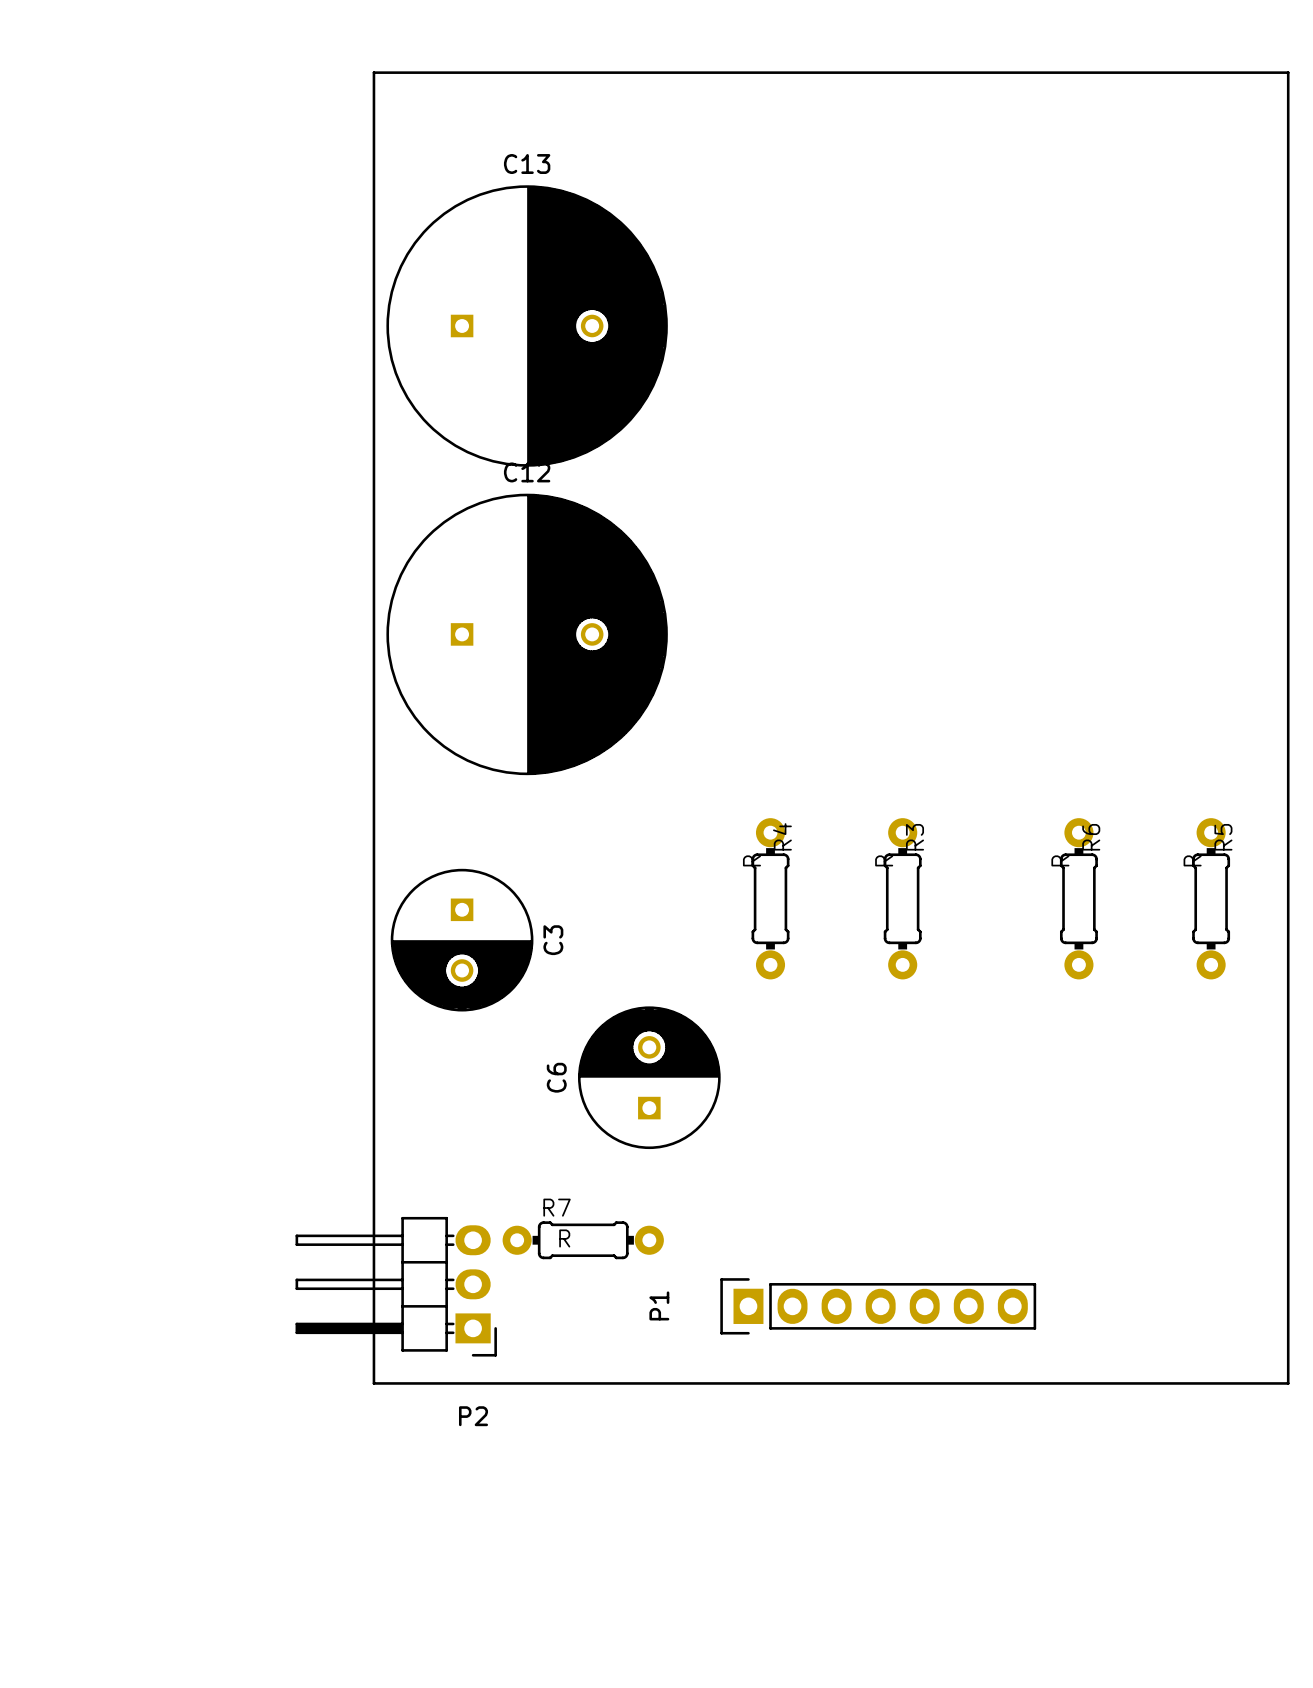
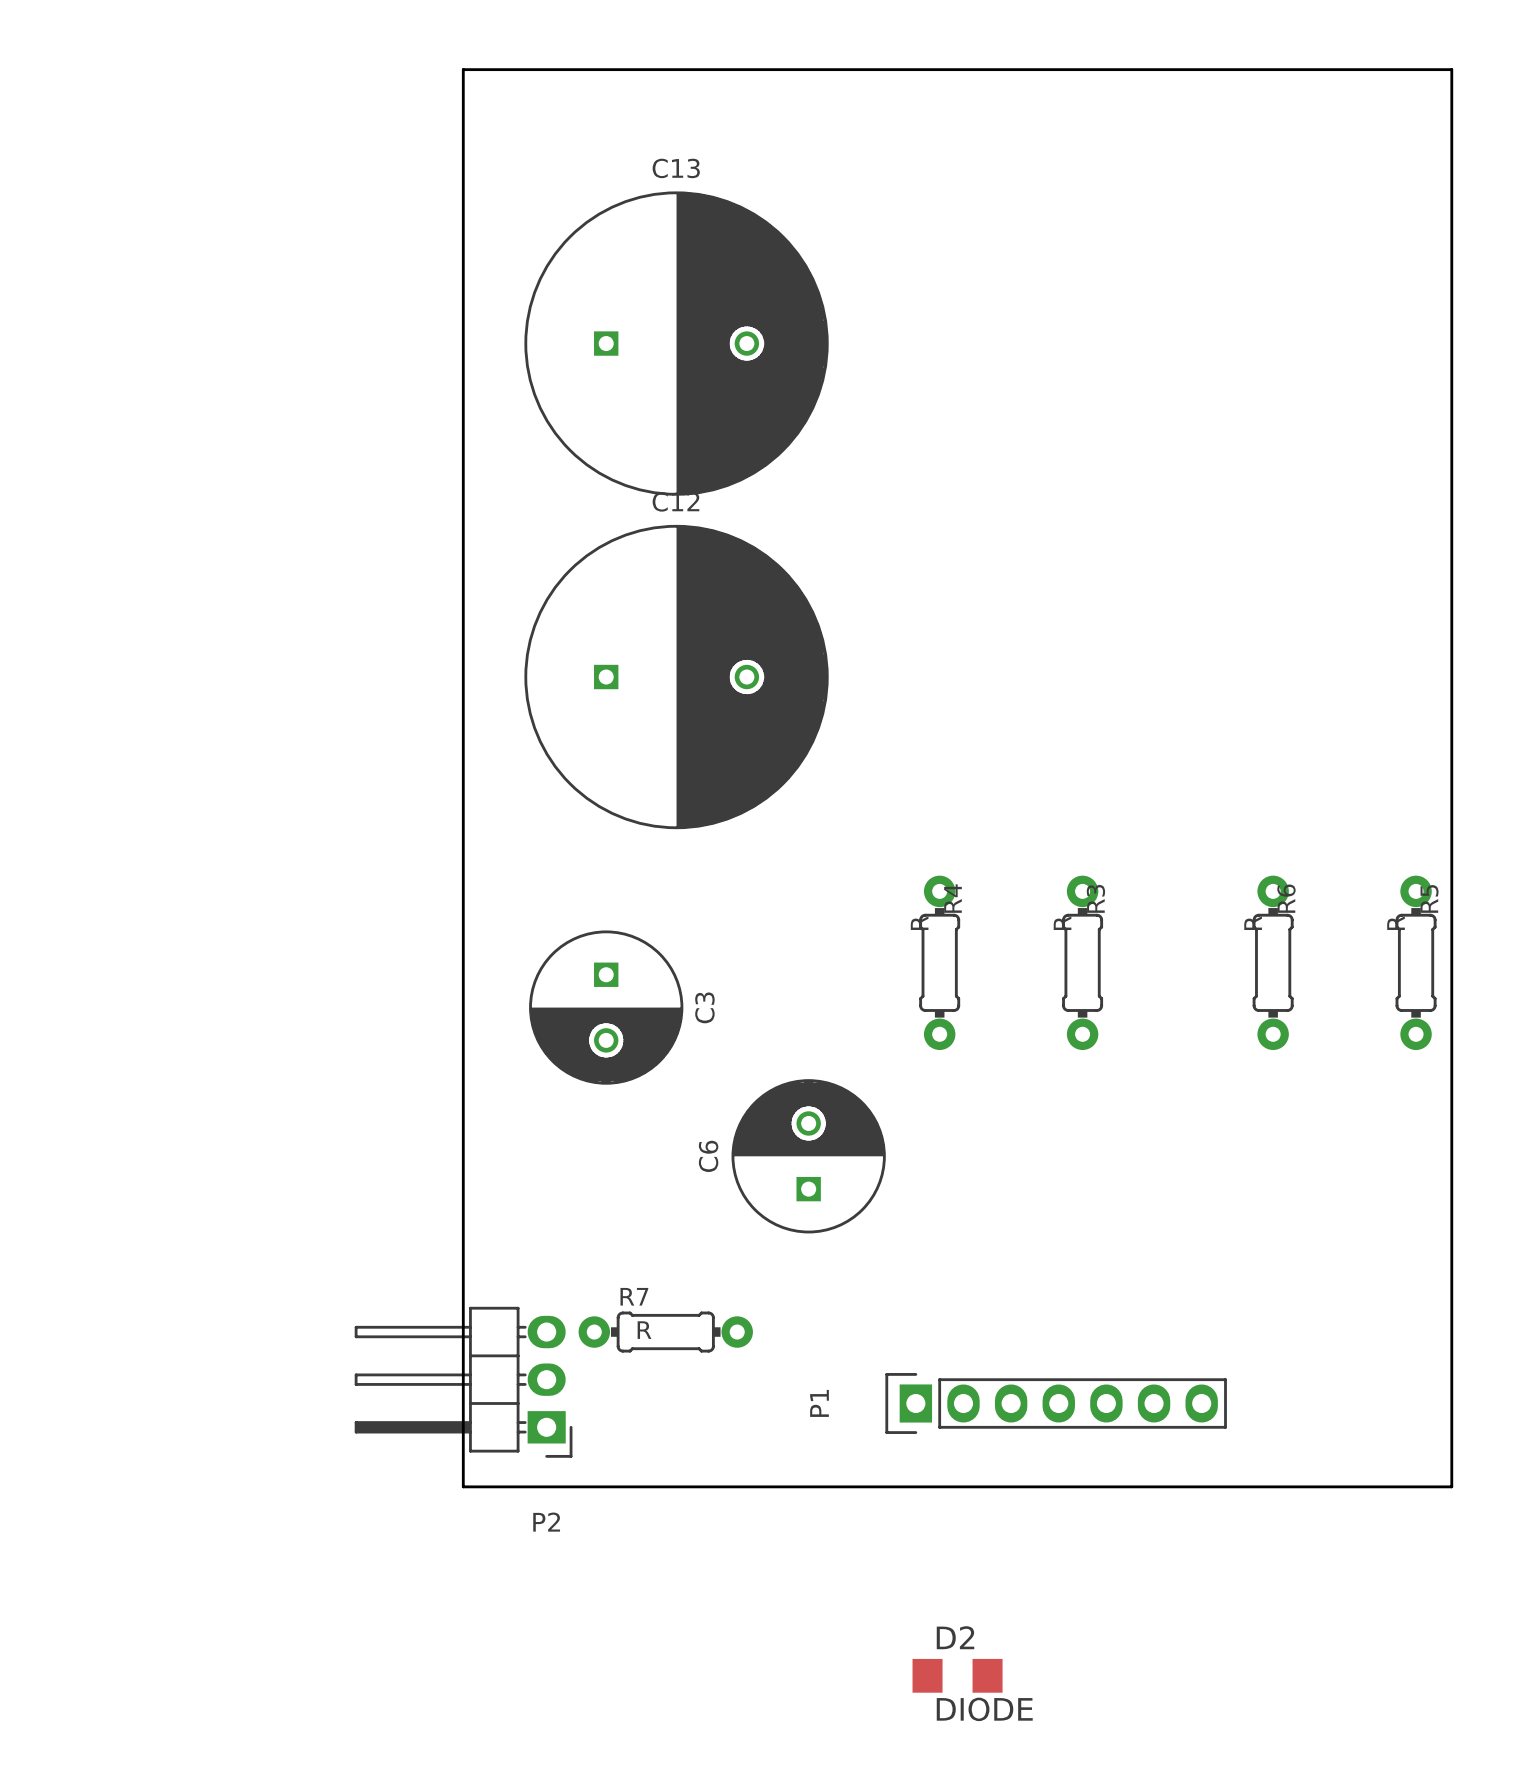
board edge: (373, 72) (373, 1383) -> (510, 69) (463, 69) (463, 1486) (510, 1486)
board edge: (1244, 72) (1288, 72) (1288, 1383) (1244, 1383) -> (1451, 69) (1451, 1486)
R7 position: (583, 1240) -> (665, 1332)
P2 position: (396, 1286) -> (463, 1382)
D2: none -> DIODE (957, 1675)

